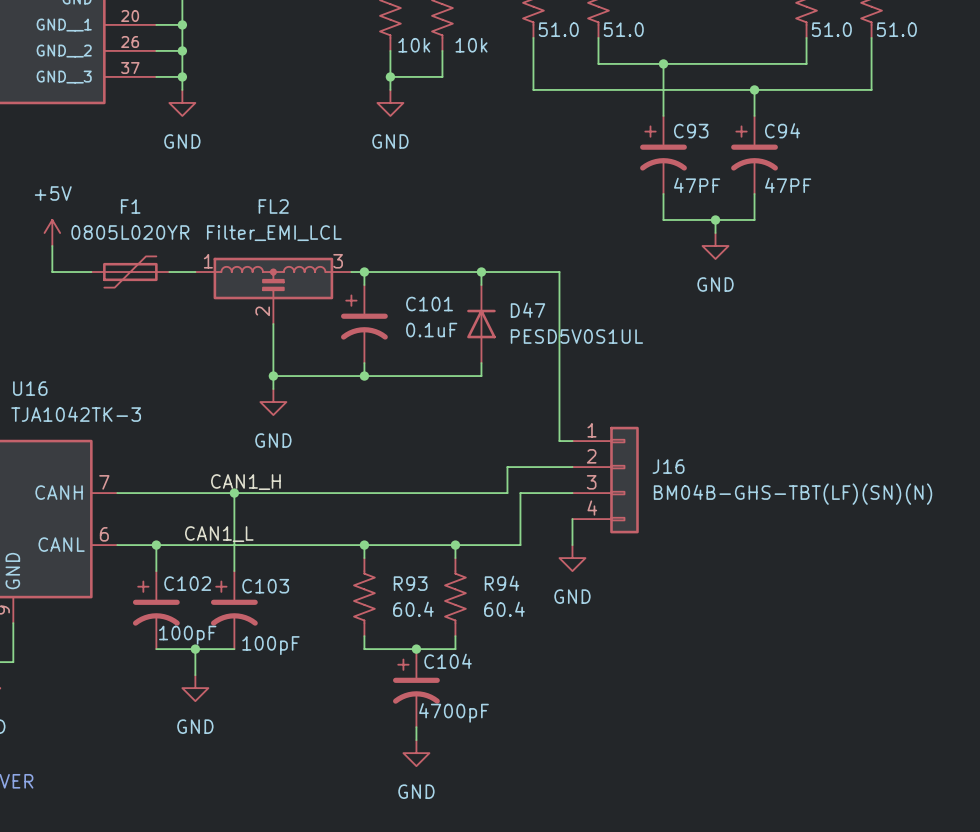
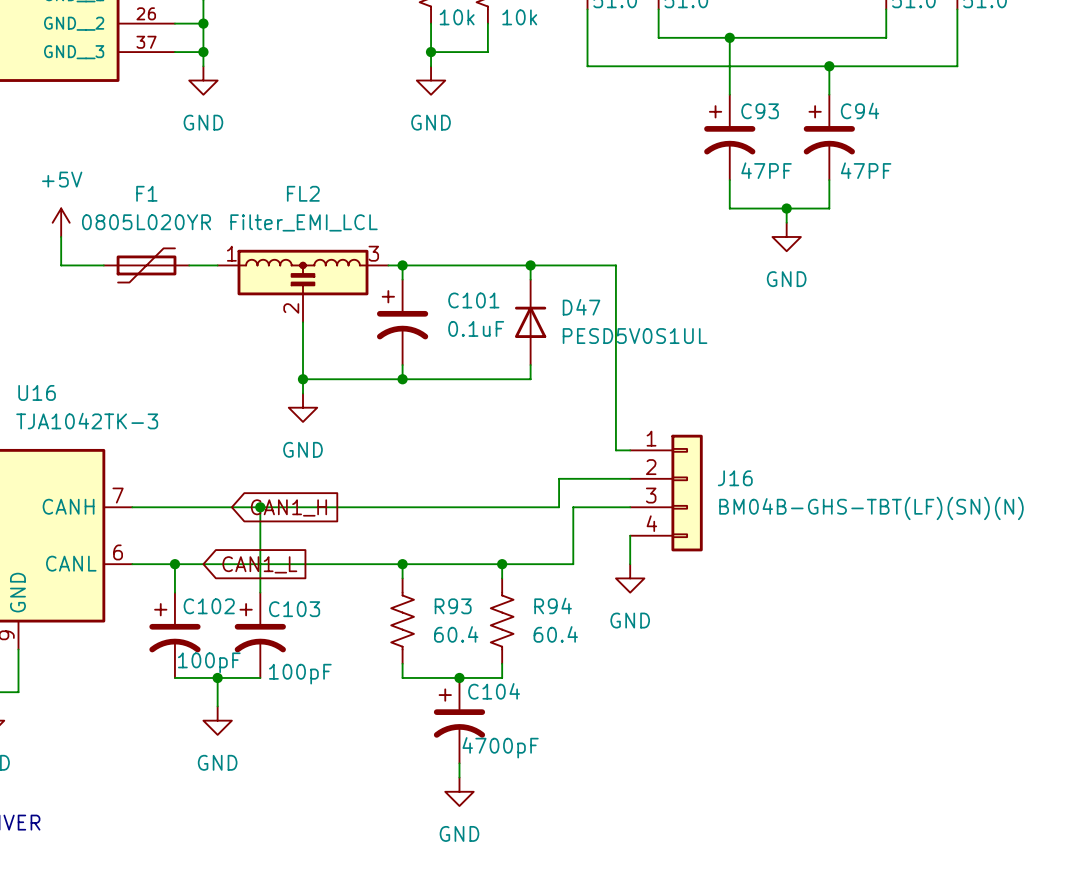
label: CAN1_H (245, 482) -> none
global label: none -> CAN1_H (288, 507)
label: CAN1_L (219, 534) -> none
global label: none -> CAN1_L (259, 564)

